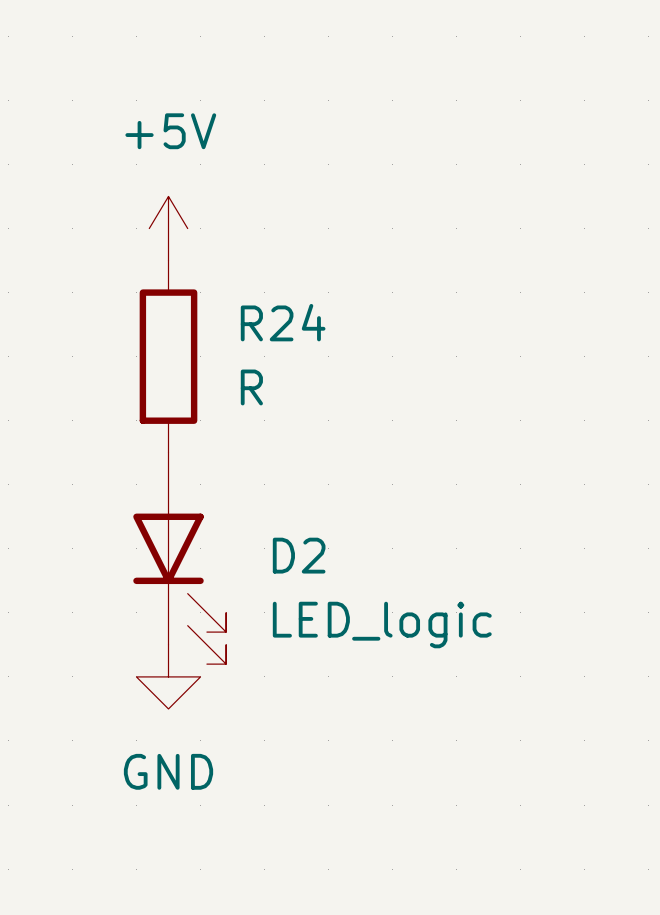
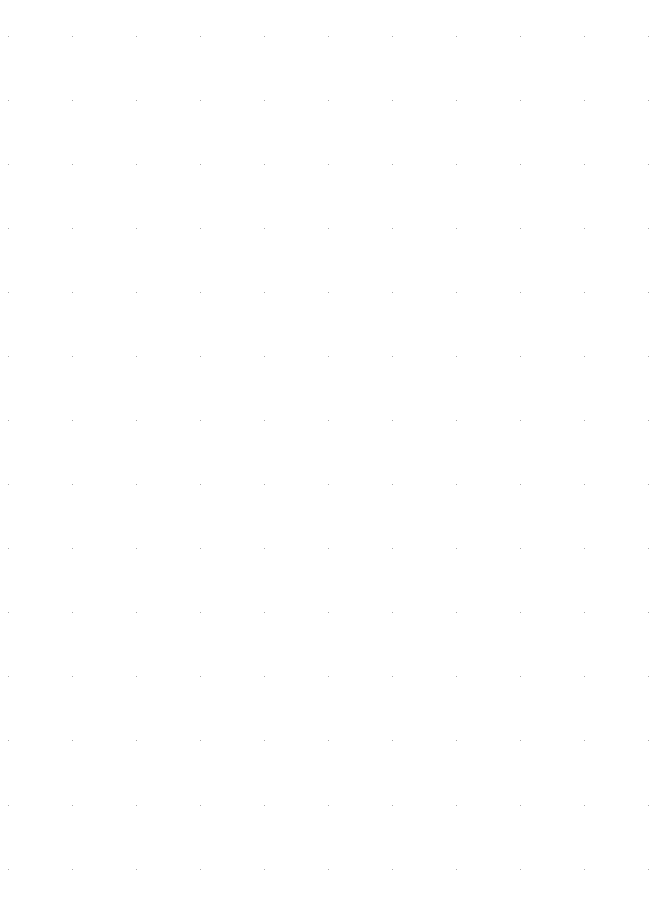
power symbol: +5V (168, 228) -> none
R24: R (168, 356) -> none
D2: LED_logic (179, 558) -> none
power symbol: GND (168, 676) -> none

